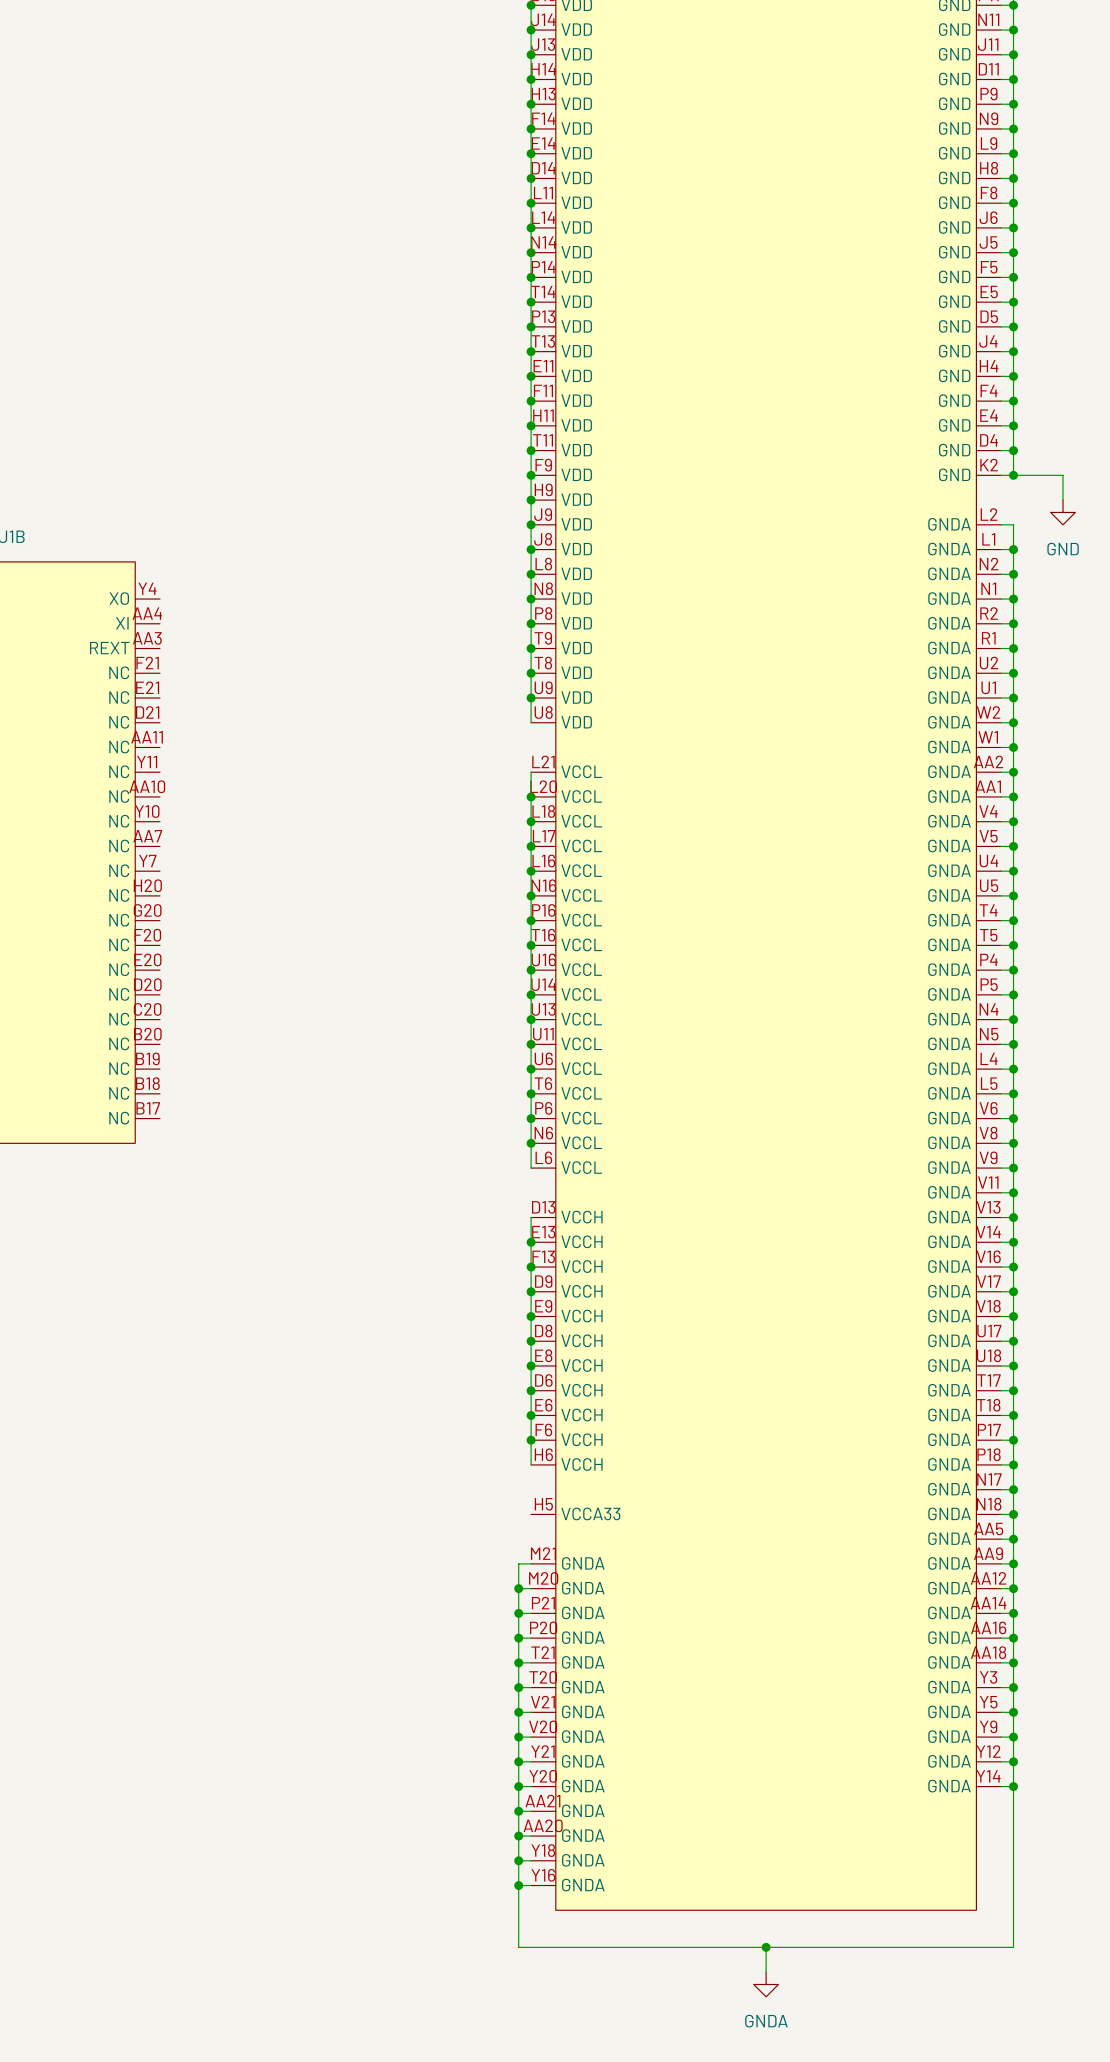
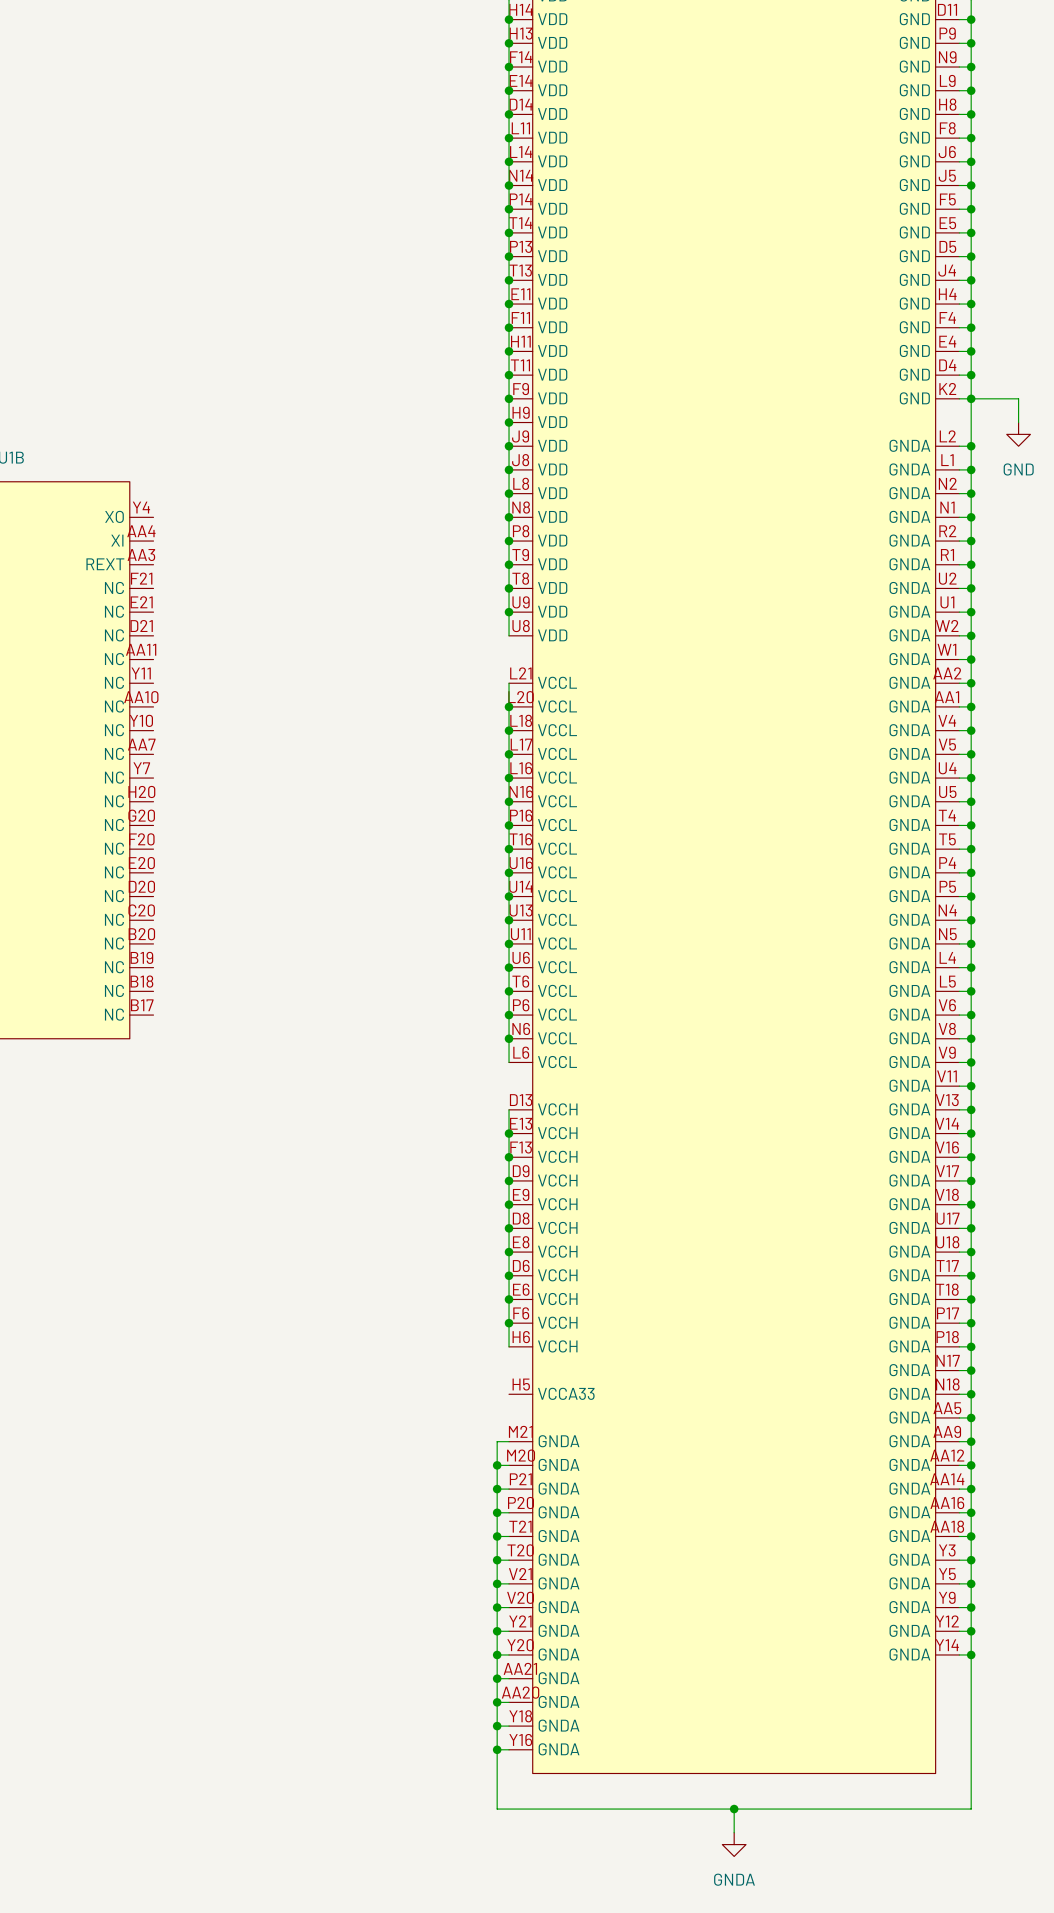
wire: none -> (971, 398) (971, 446)
junction: none -> (971, 446)

